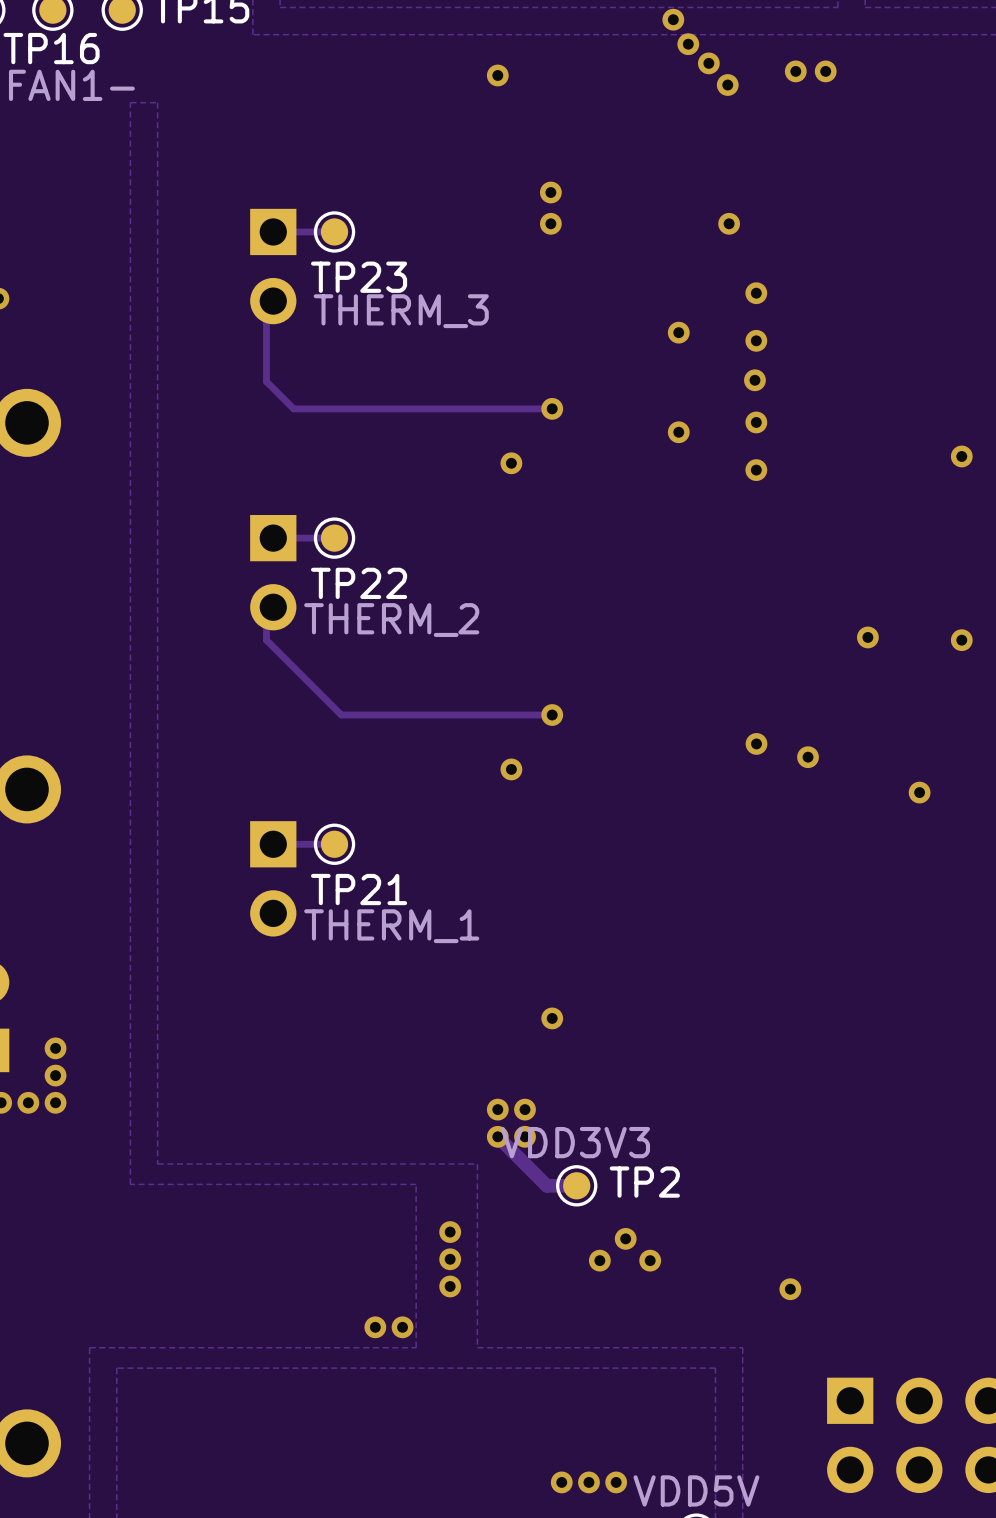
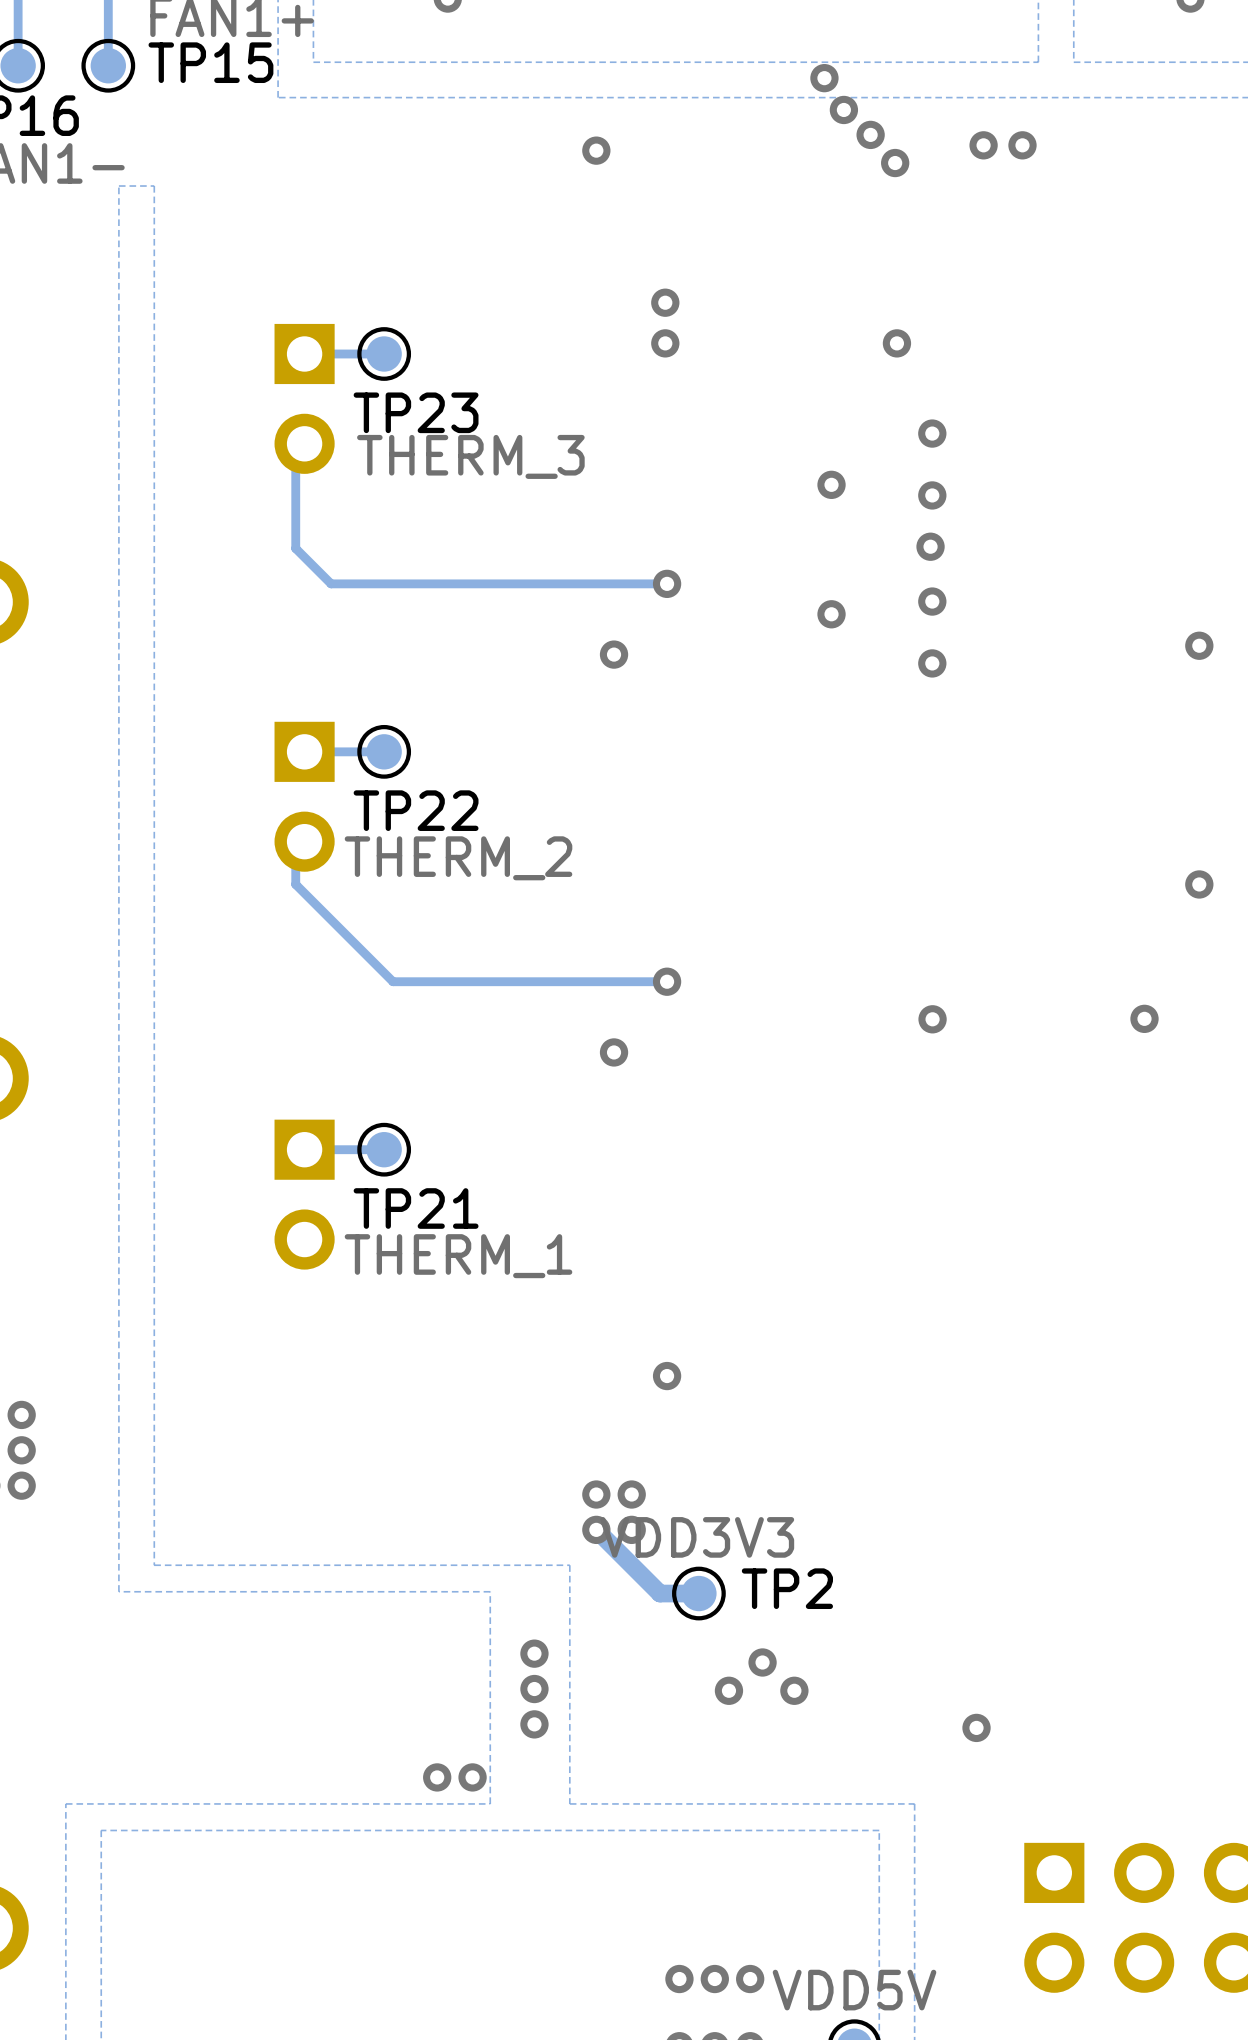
via: (867, 637) -> none
via: (808, 757) -> none
via position: (919, 792) -> (1144, 1018)

